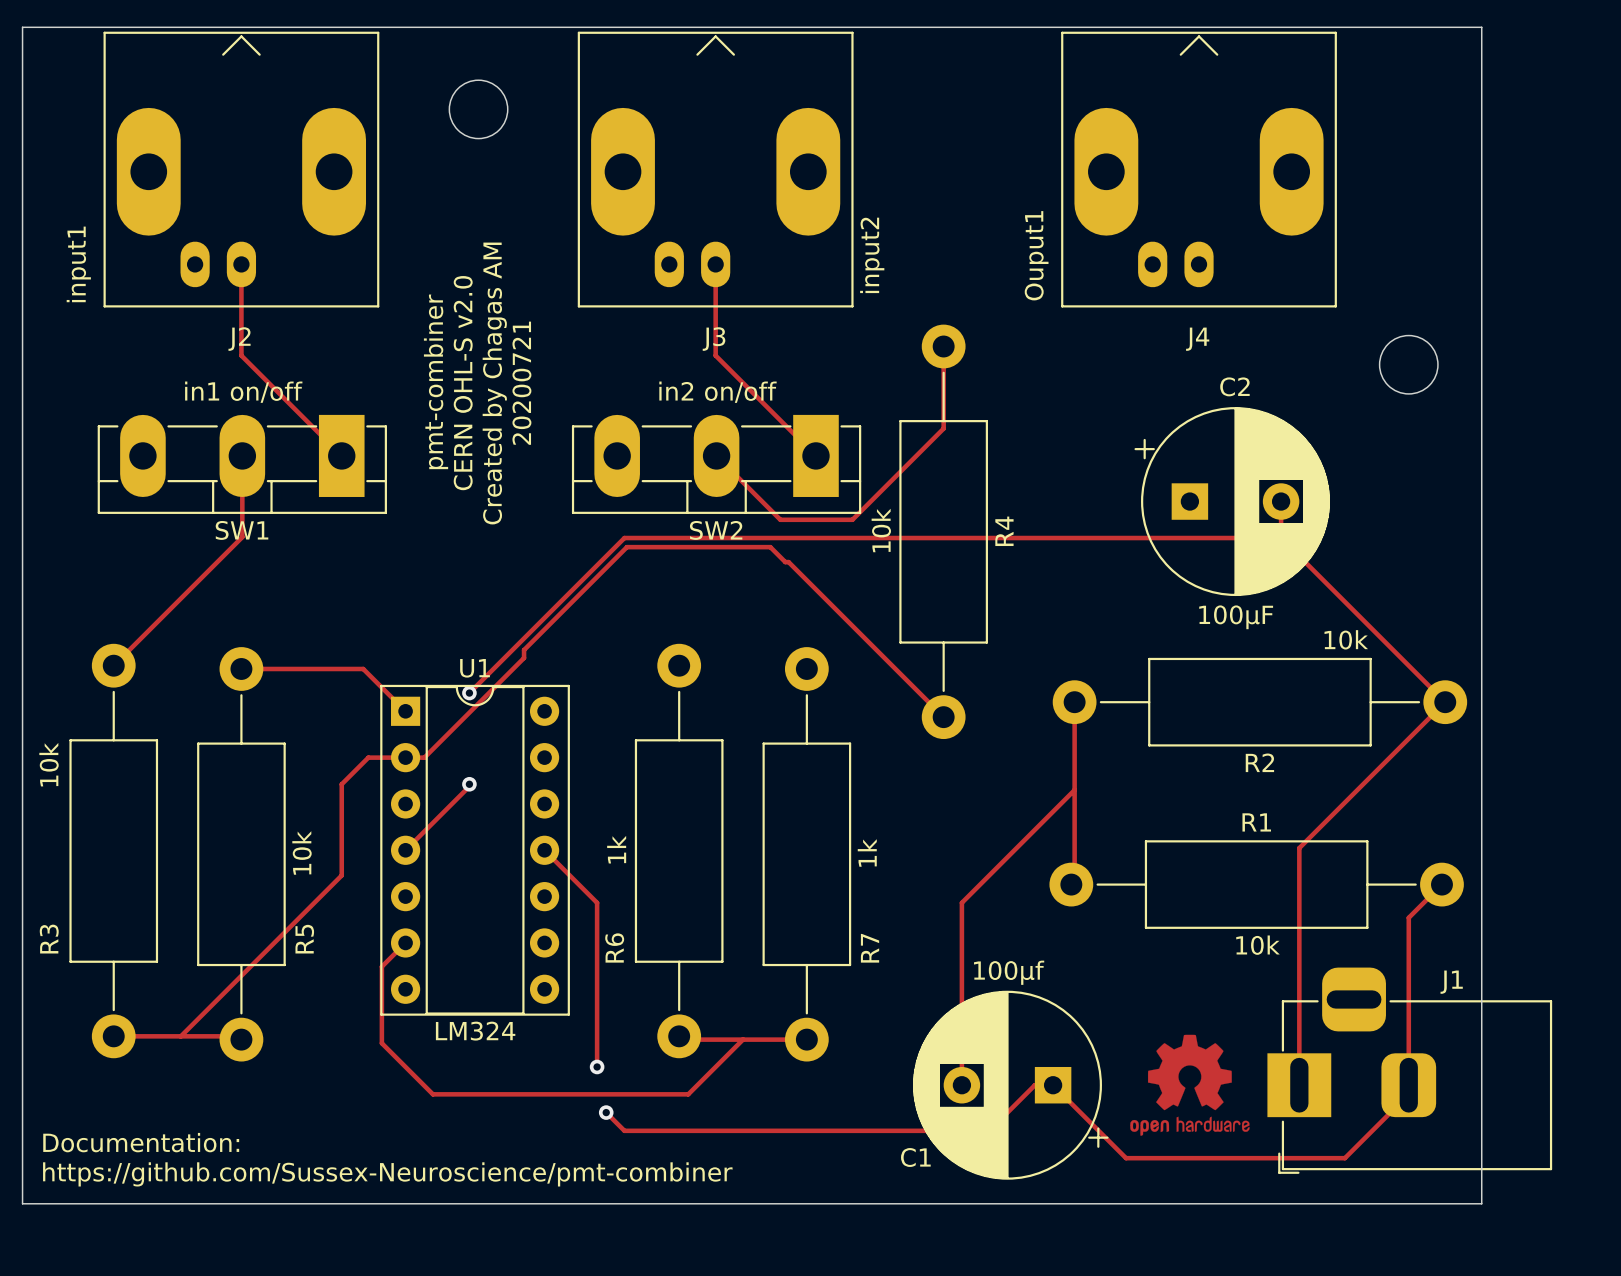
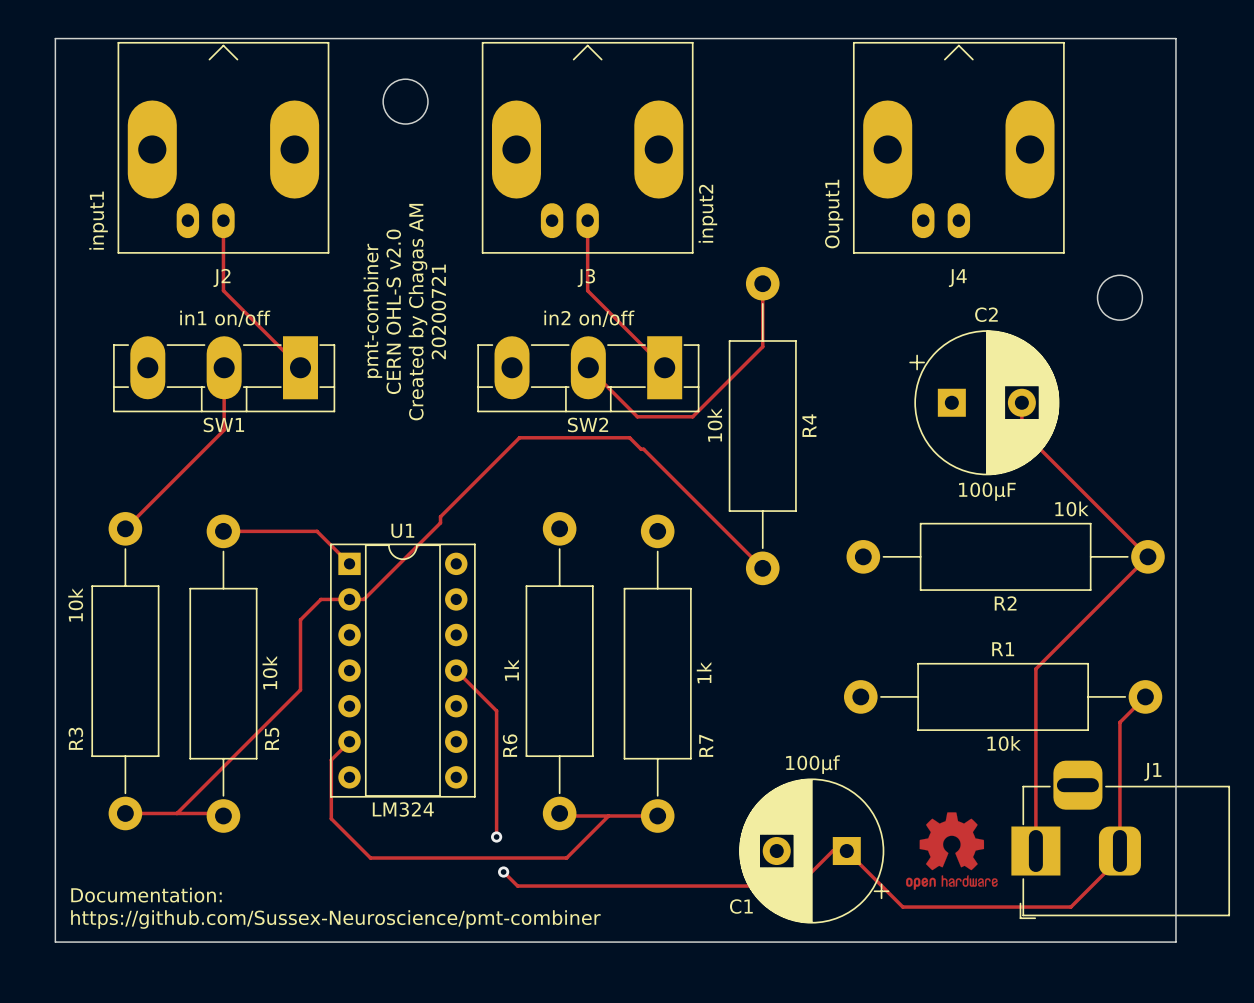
track: (1281, 538) (624, 538) (469, 693) -> none
via: (469, 693) -> none
track: (1074, 702) (1074, 881) (1071, 884) -> none
via: (469, 784) -> none
track: (469, 786) (405, 850) -> none
track: (1074, 790) (961, 902) (961, 1085) -> none

